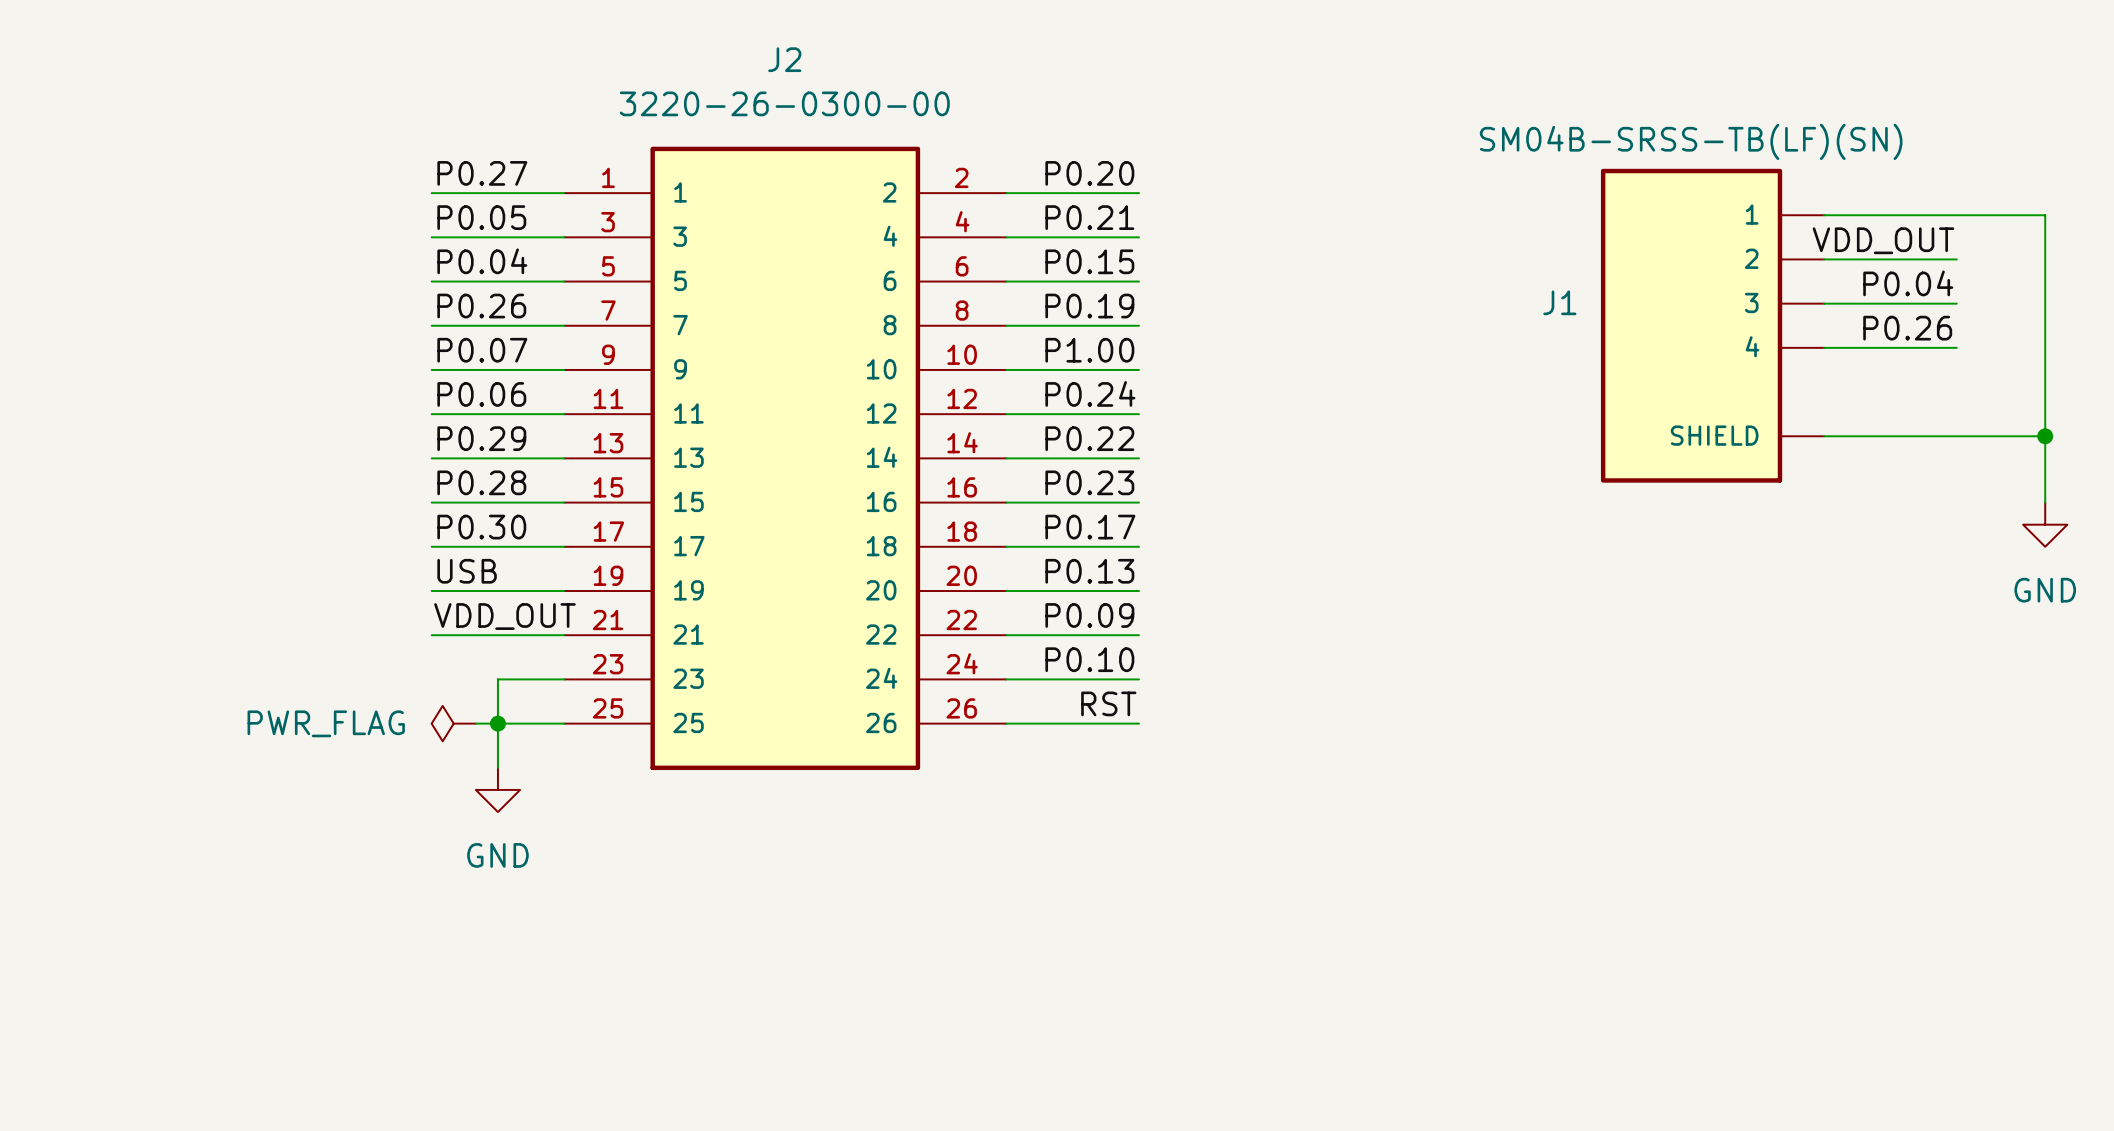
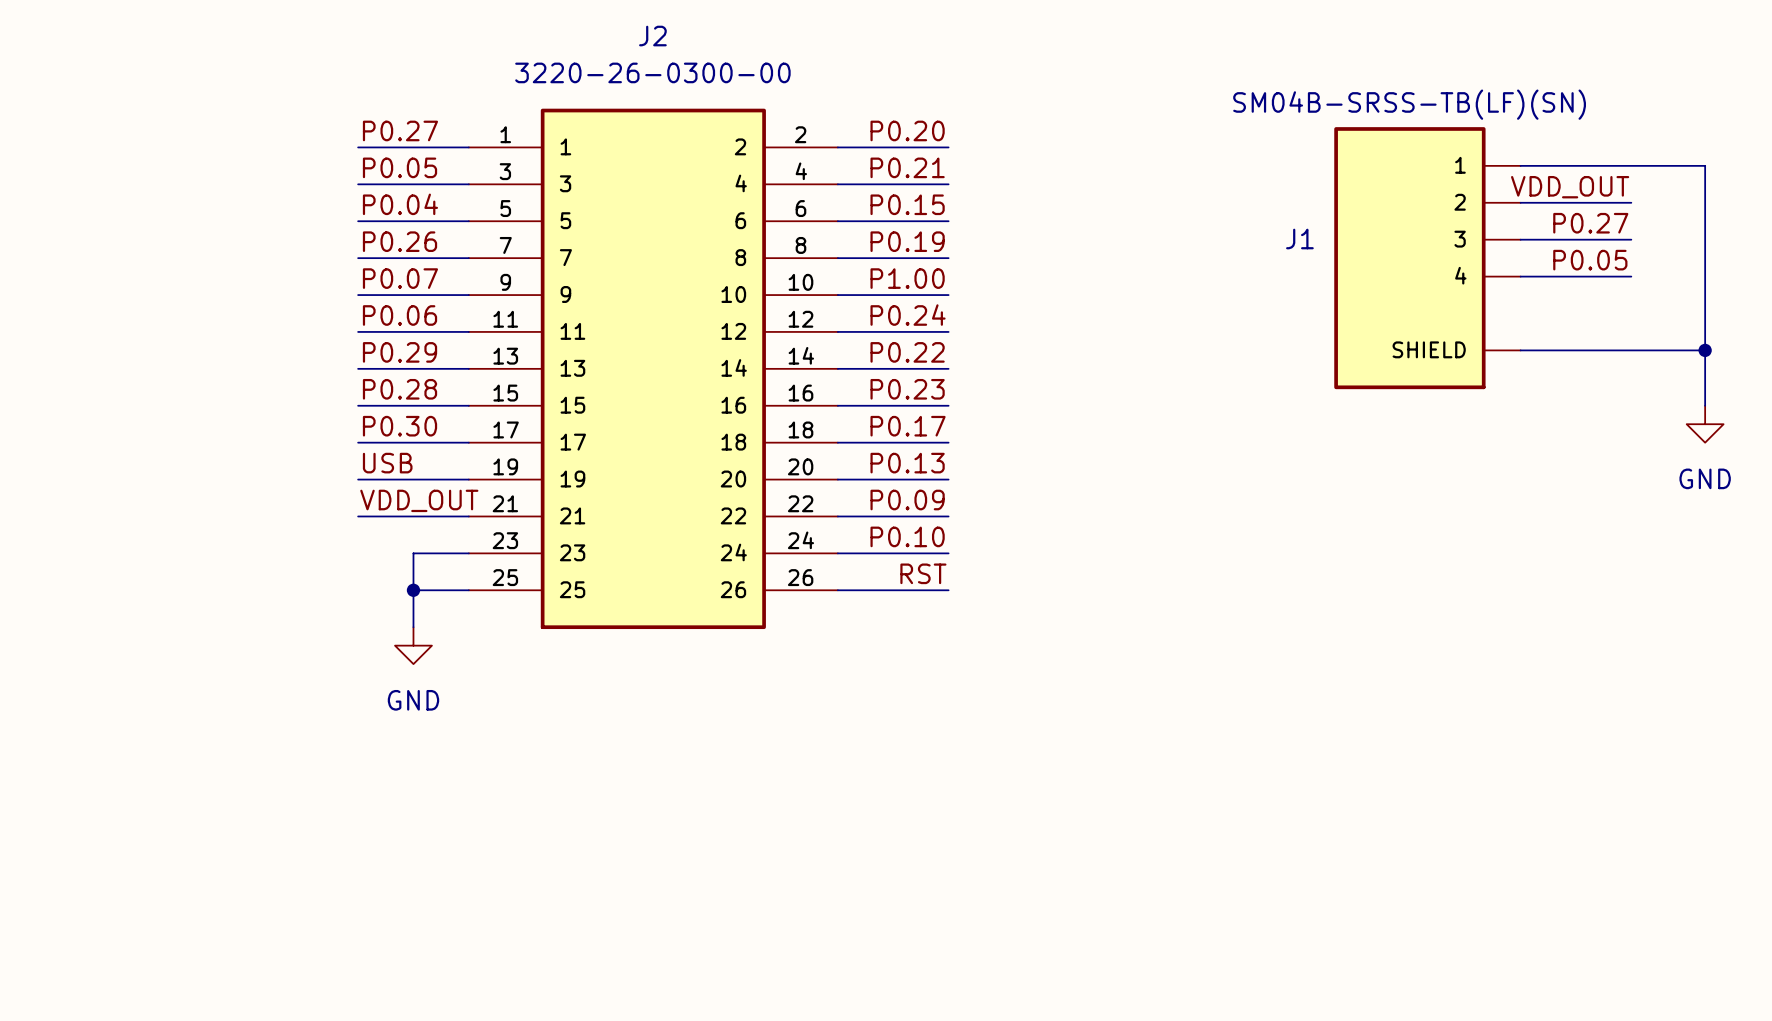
label: P0.04 (1908, 283) -> P0.27 (1590, 223)
label: P0.26 (1907, 328) -> P0.05 (1590, 260)
power symbol: PWR_FLAG (453, 723) -> none
wire: (475, 723) (497, 723) -> none

